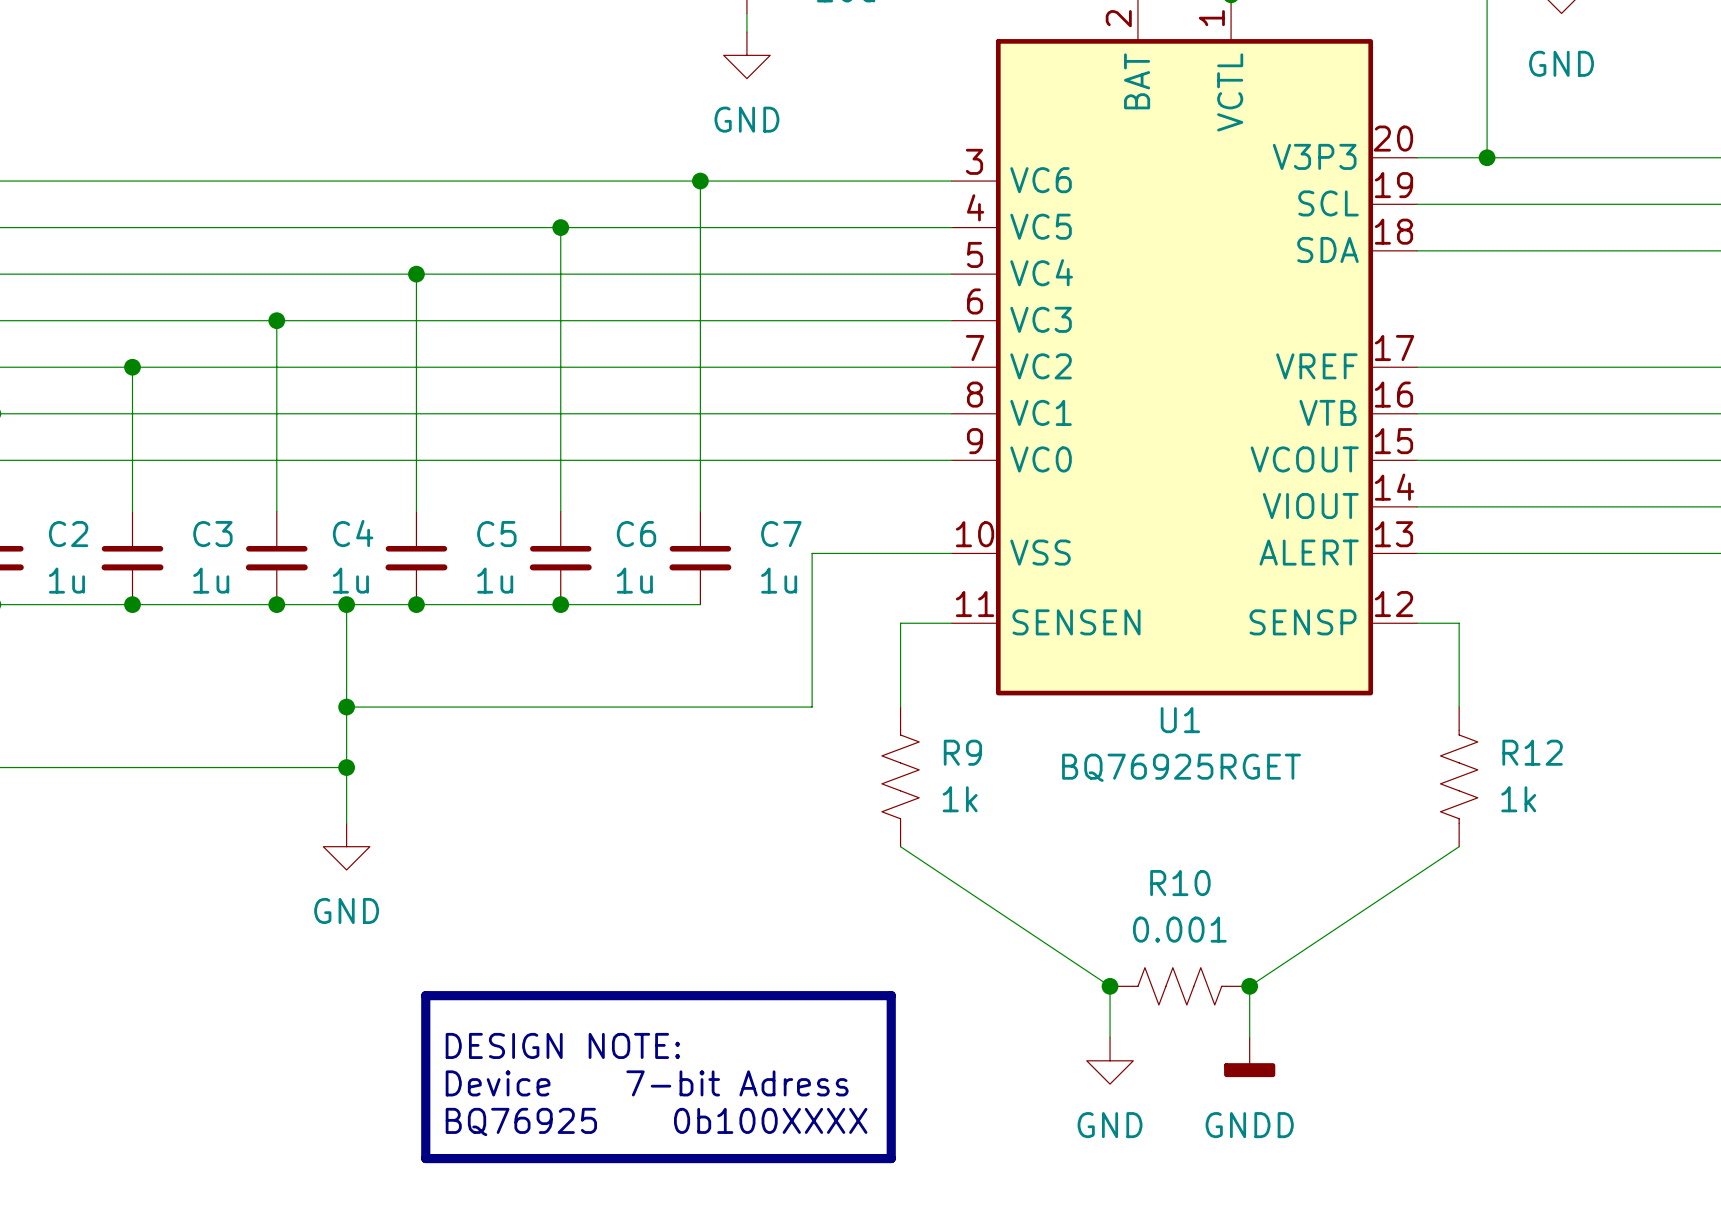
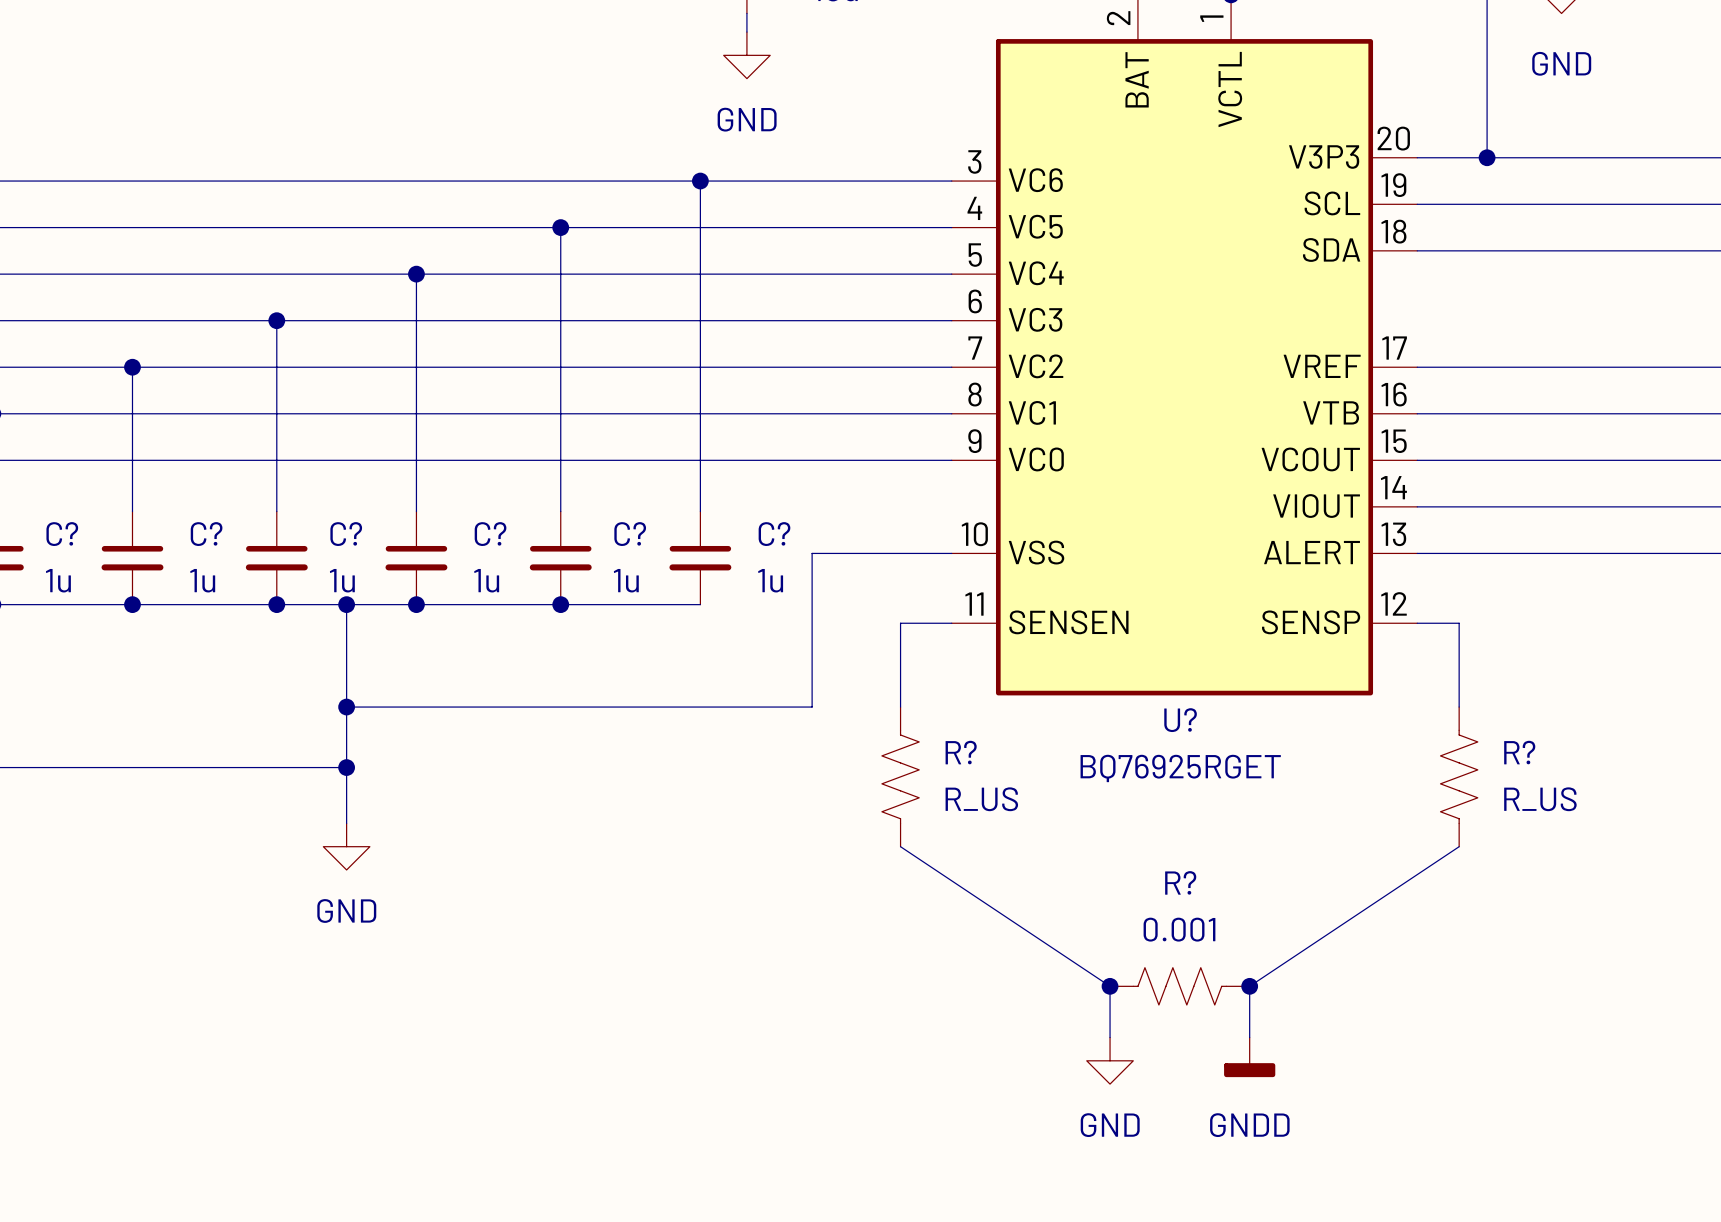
C4 name: C4 (353, 533) -> C? (346, 534)
C2 name: C2 (68, 534) -> C? (62, 534)
C3 name: C3 (212, 534) -> C? (206, 534)
C5 name: C5 (496, 534) -> C? (490, 534)
C6 name: C6 (636, 534) -> C? (630, 534)
C7 name: C7 (781, 534) -> C? (774, 534)
U1 name: U1 (1180, 720) -> U? (1180, 720)
R9 name: R9 (962, 752) -> R? (961, 752)
R12 name: R12 (1532, 752) -> R? (1519, 752)
R9 value: 1k (960, 799) -> R_US (981, 799)
R12 value: 1k (1518, 799) -> R_US (1540, 799)
R10 name: R10 (1180, 883) -> R? (1180, 882)
line: (425, 995) (425, 1158) (891, 1158) (891, 995) (425, 995) -> none
text: DESIGN NOTE: (562, 1045) -> none
text: Device 7-bit Adress (647, 1083) -> none
text: BQ76925 0b100XXXX (656, 1121) -> none

